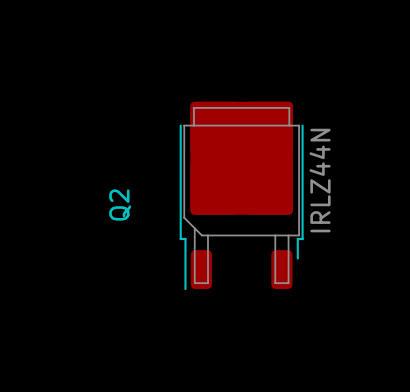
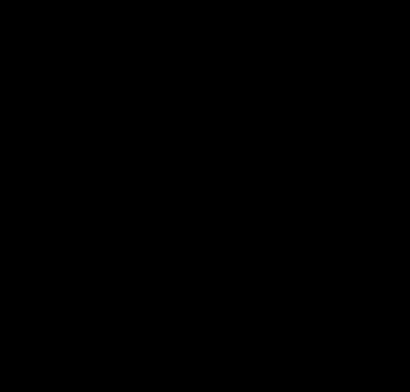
Q2: IRLZ44N (241, 195) -> none

